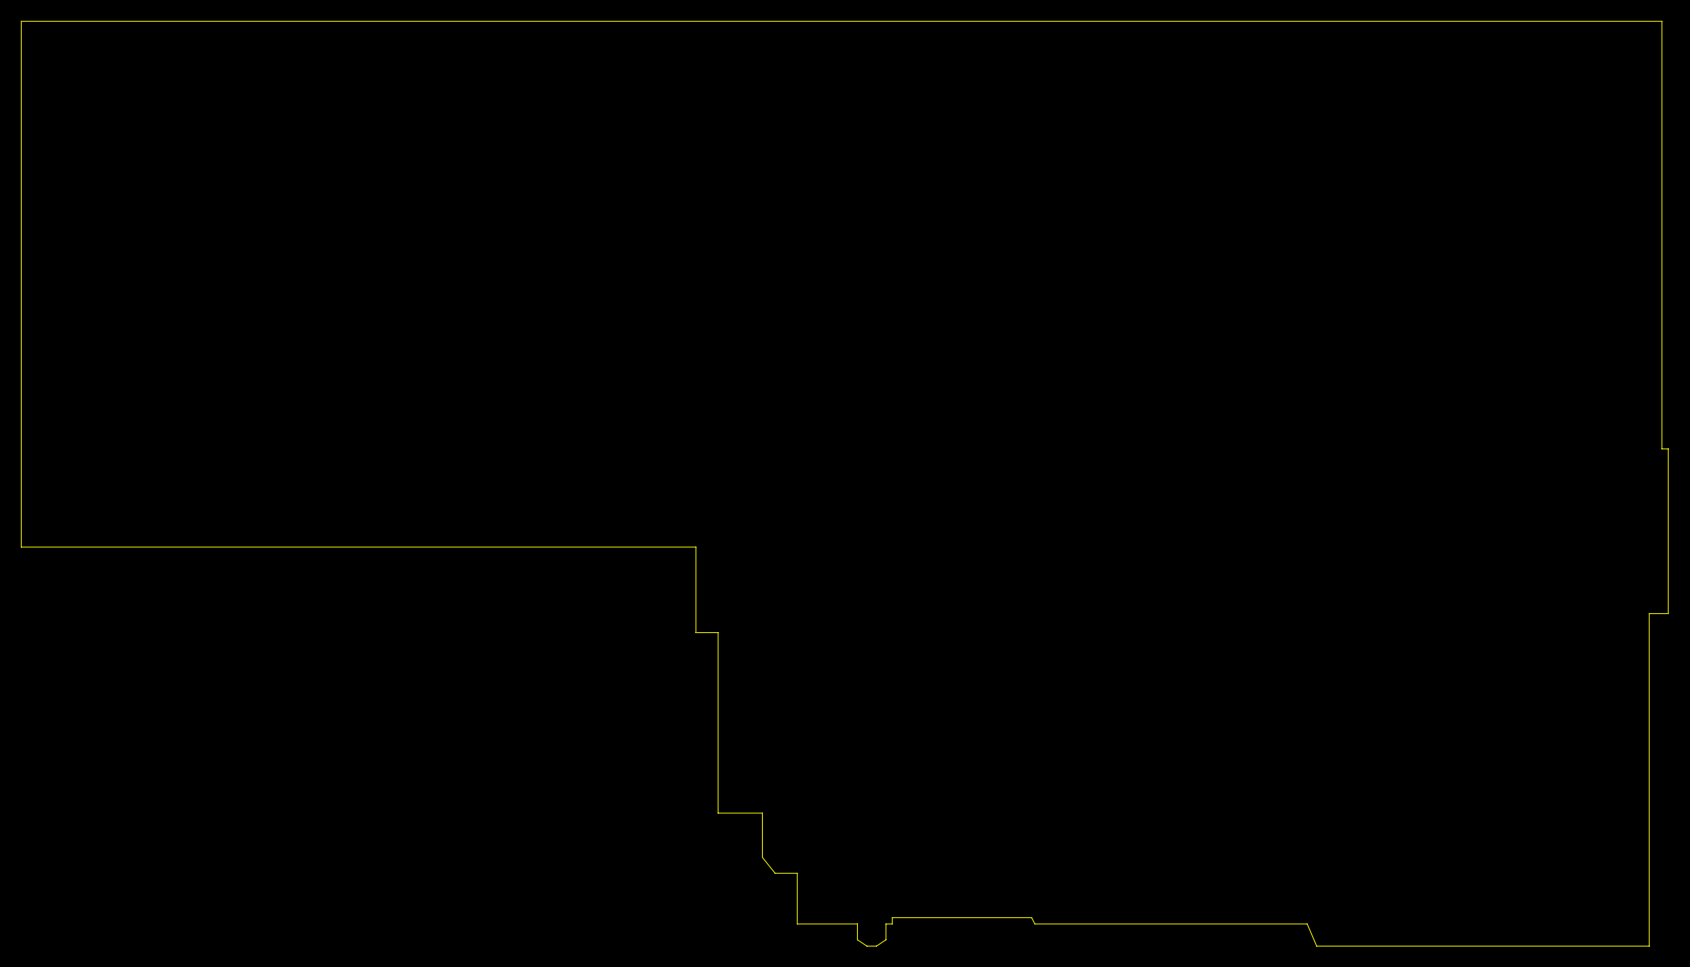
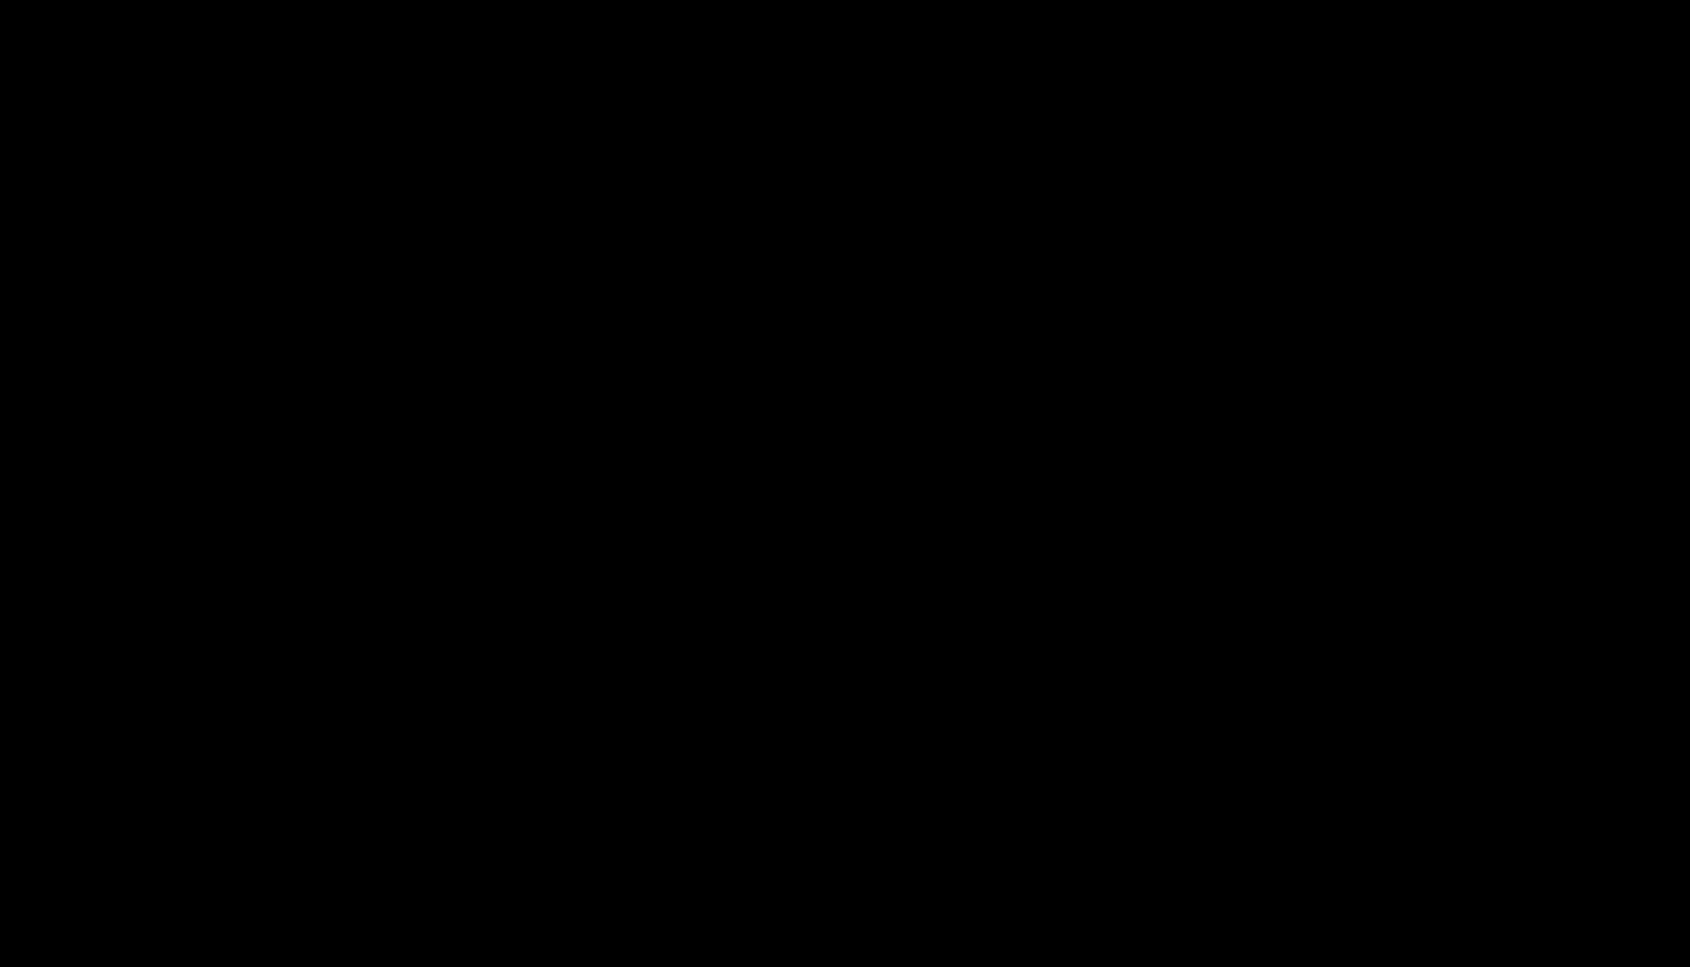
board edge: (21, 21) (21, 547) (695, 547) (695, 632) (718, 632) (718, 813) (762, 813) (762, 857) (775, 873) (797, 873) (797, 923) (857, 923) (857, 939) (866, 946) (876, 946) (885, 939) (885, 923) (892, 923) (892, 917) (1031, 917) (1034, 923) (1307, 923) (1316, 946) (1649, 946) (1649, 613) (1668, 613) (1668, 448) (1661, 448) (1661, 21) (21, 21) -> none

